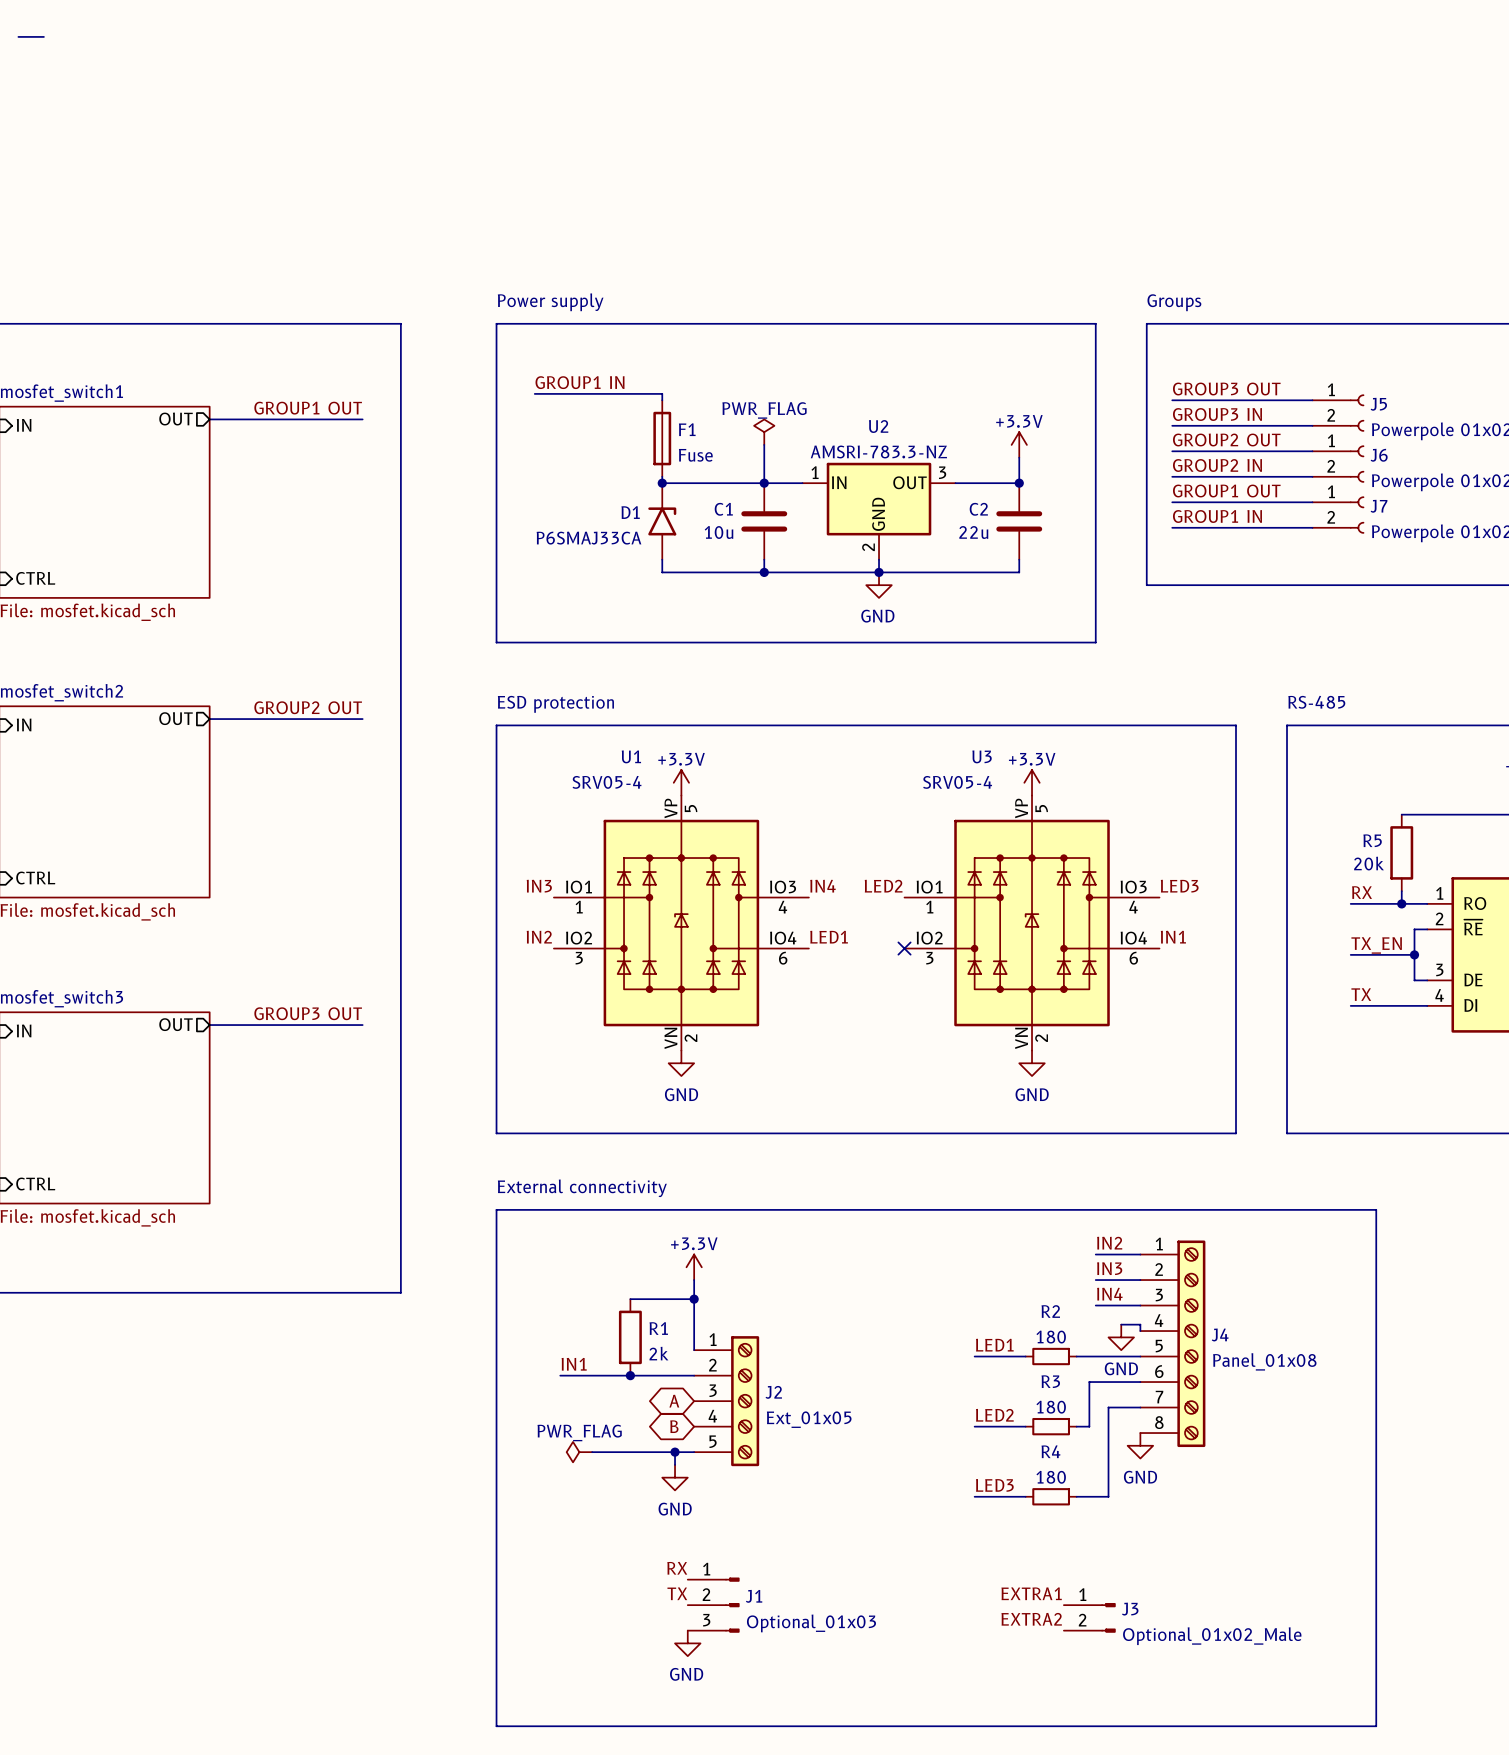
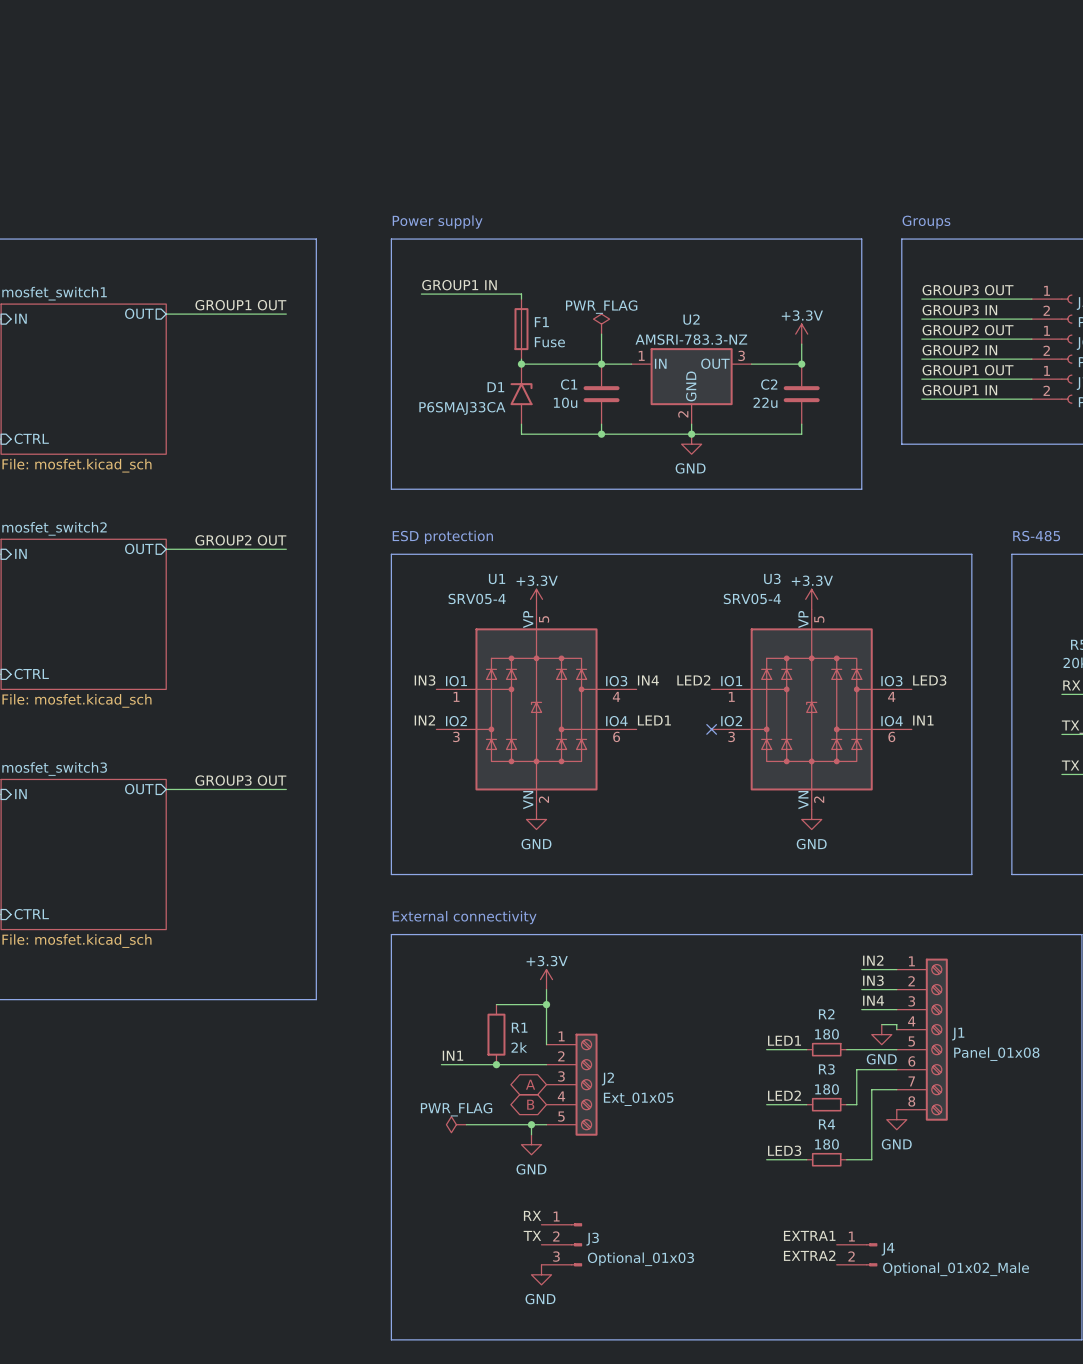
line: (18, 36) (43, 36) -> none
J4 name: J4 (1220, 1334) -> J1 (958, 1034)
J1 name: J1 (754, 1596) -> J3 (592, 1239)
J3 name: J3 (1130, 1609) -> J4 (888, 1249)

